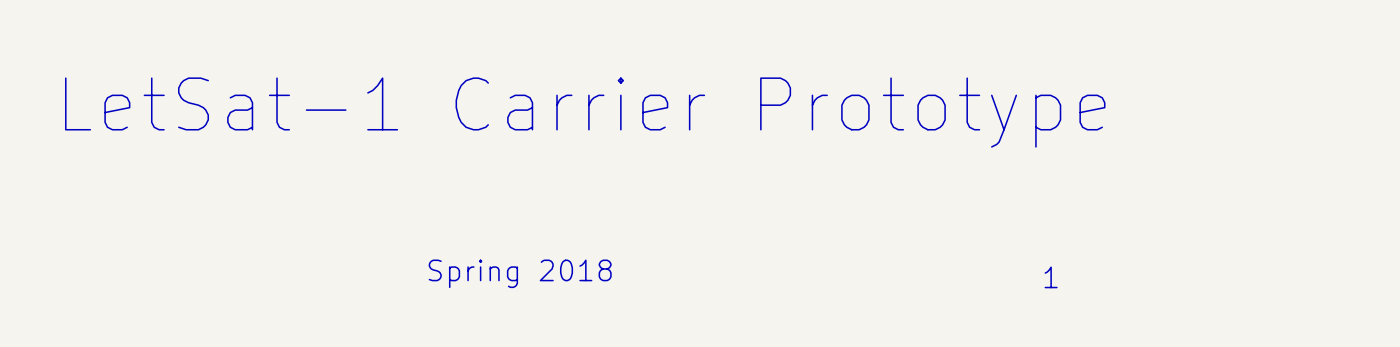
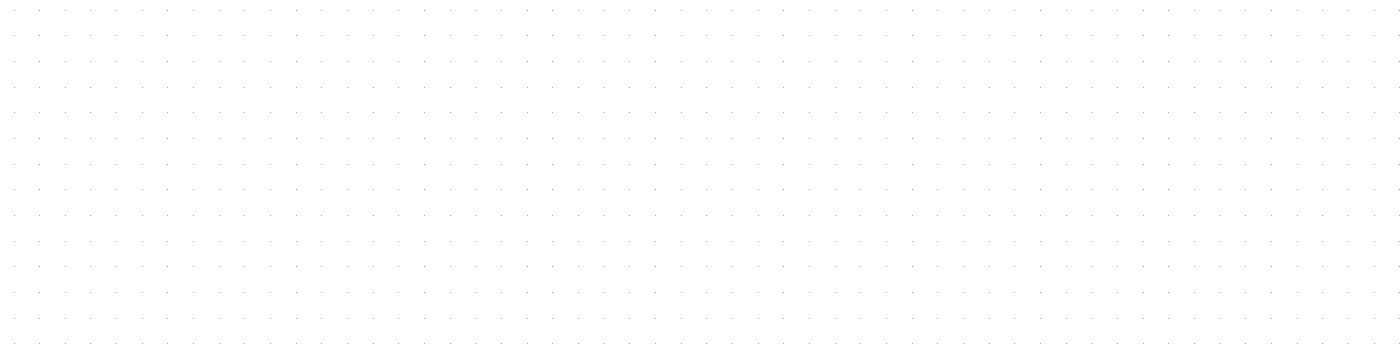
text: LetSat-1 Carrier Prototype (585, 112) -> none
text: Spring 2018 (520, 273) -> none
text: 1 (1051, 277) -> none

